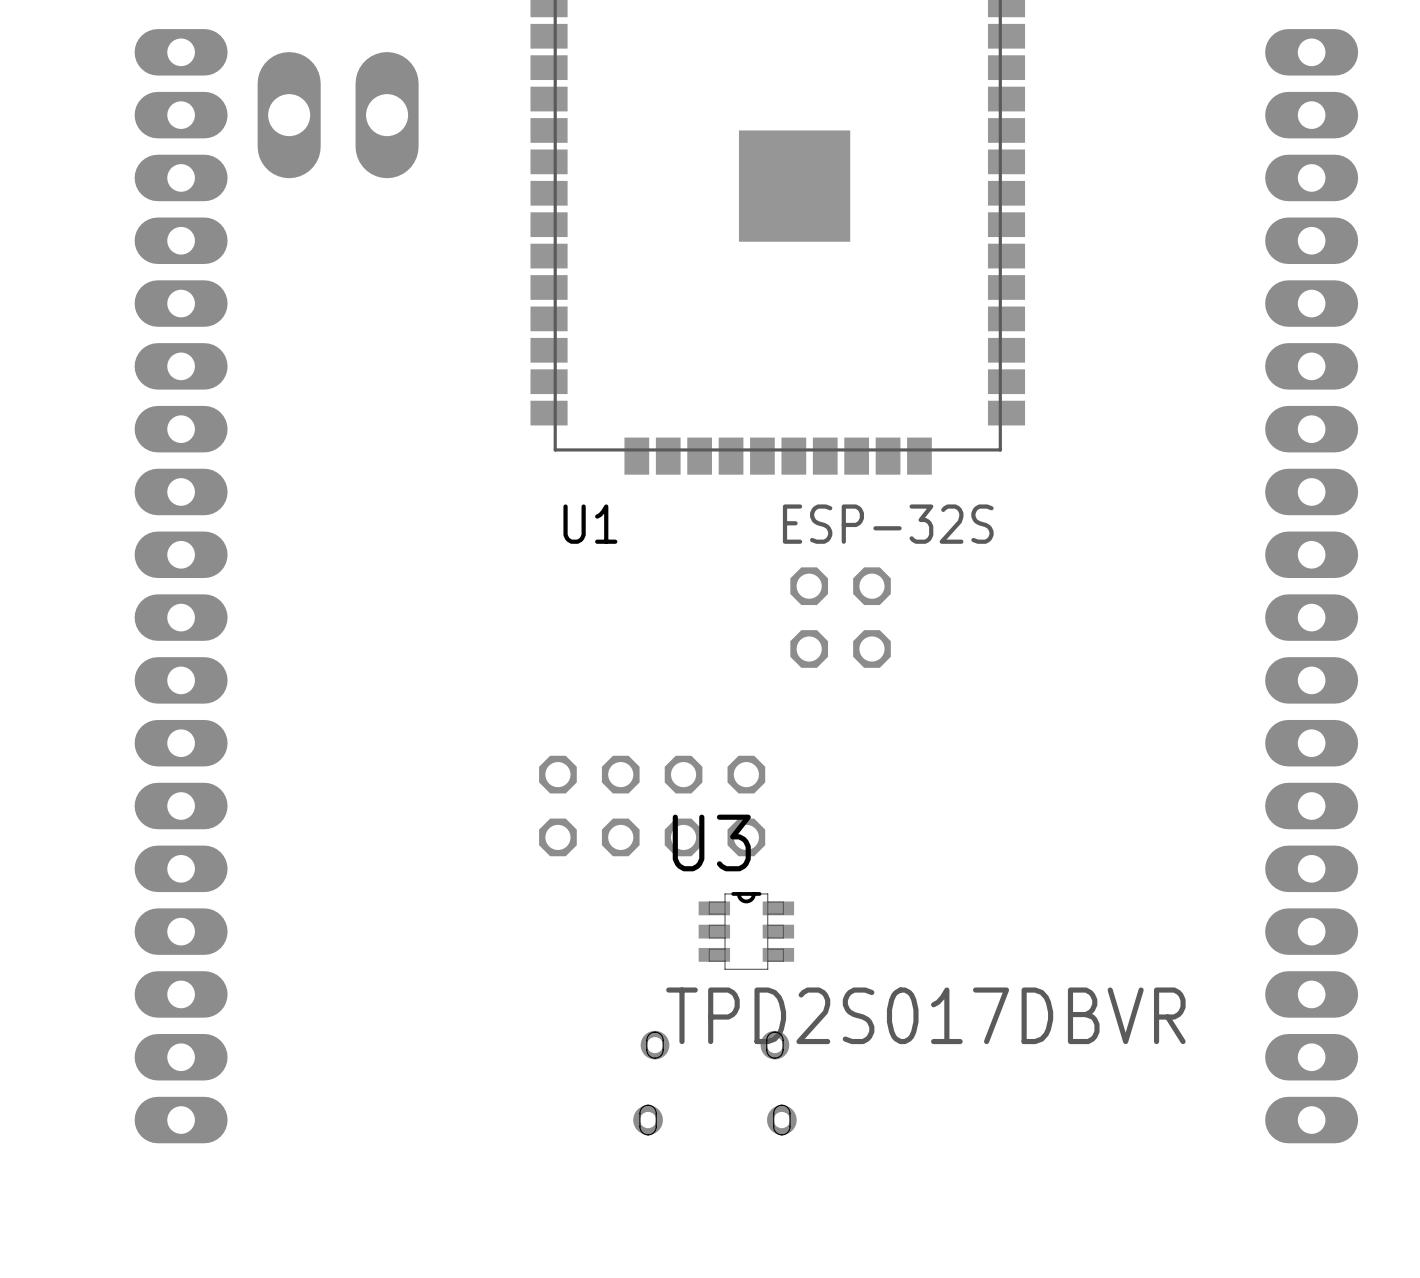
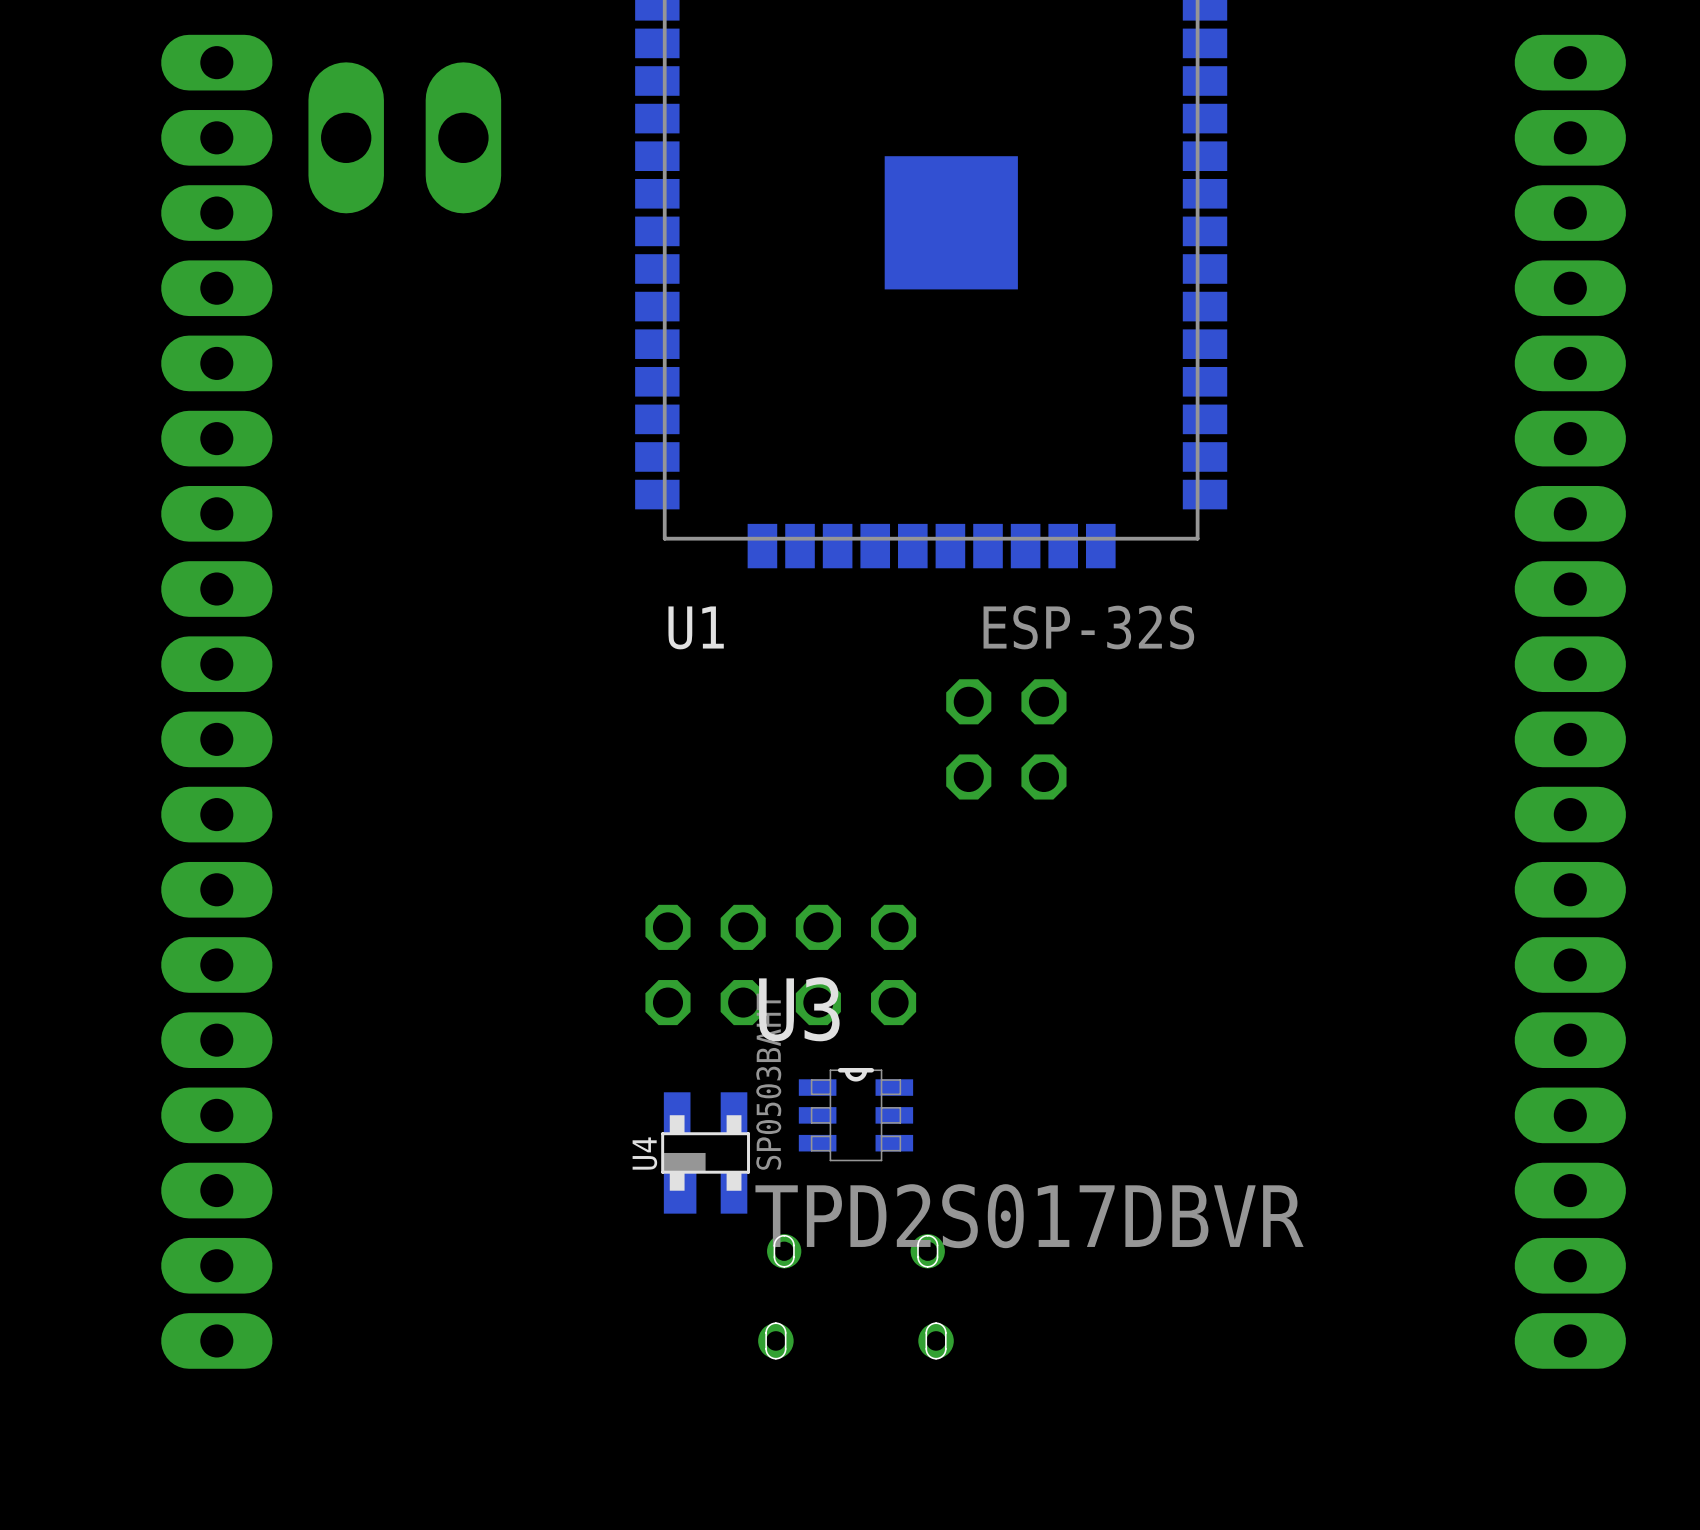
U3 position: (746, 930) -> (855, 1114)
U4: none -> SP0503BAHT (705, 1152)

